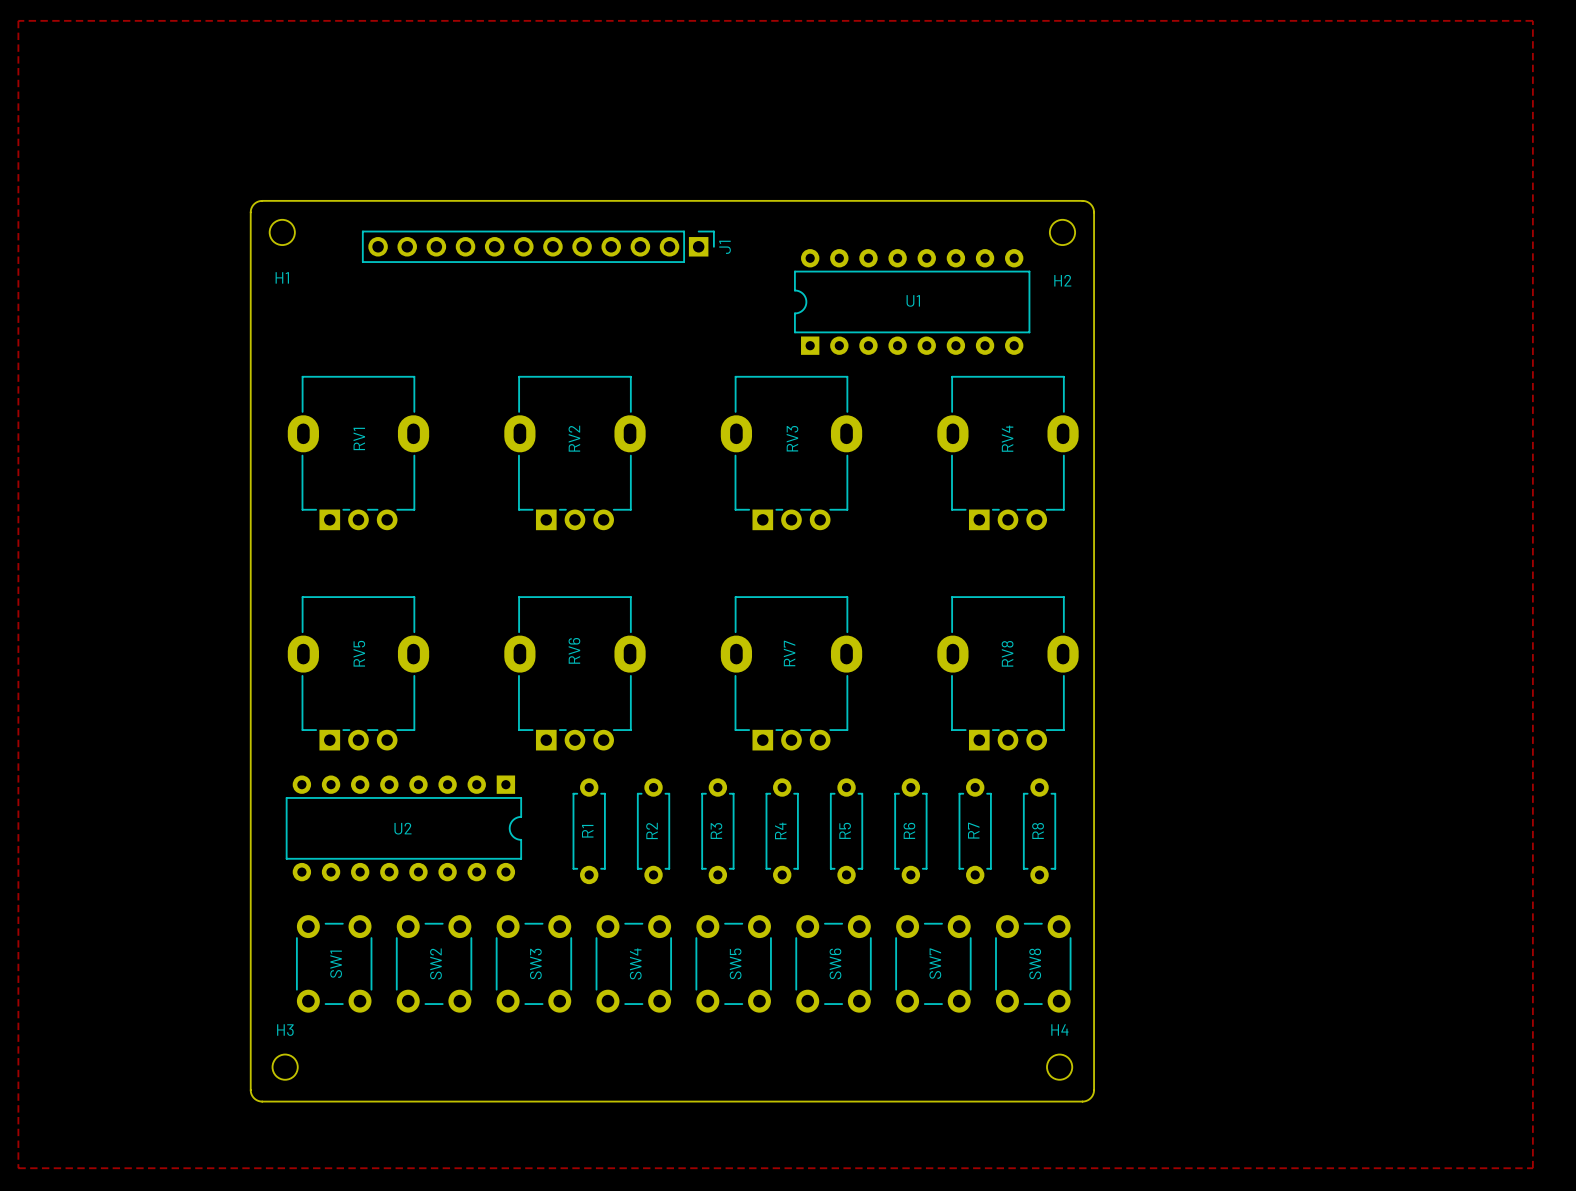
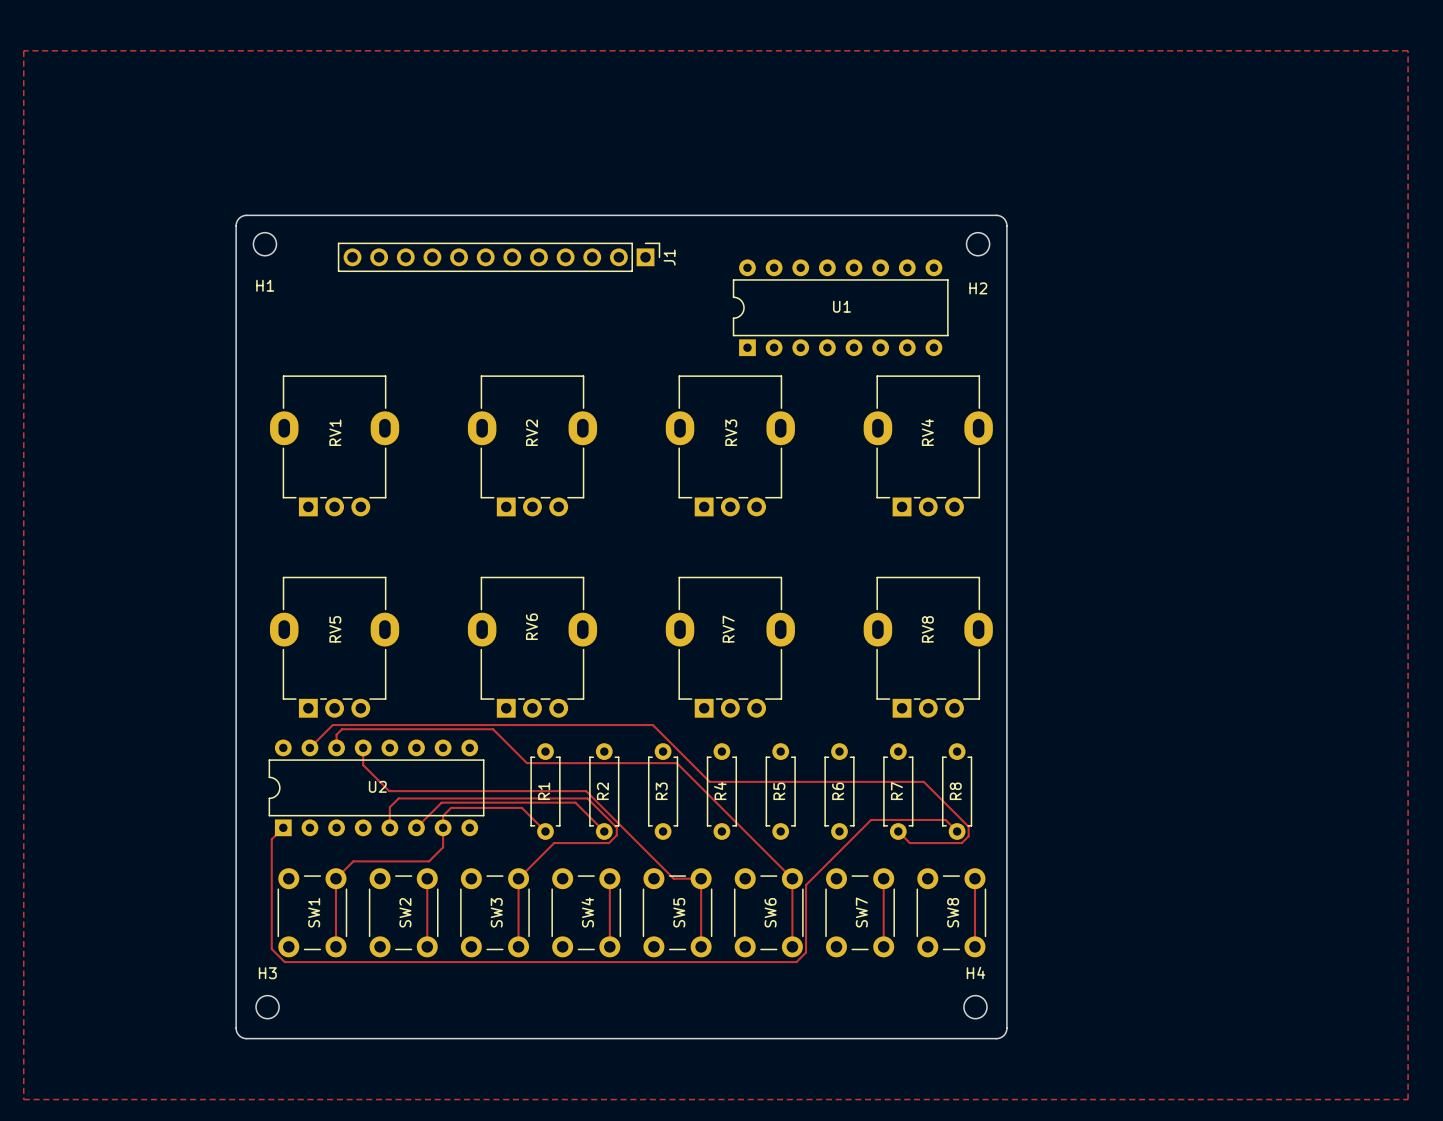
track: none -> (309, 747) (332, 725) (652, 725) (709, 781) (923, 781) (968, 826) (968, 836) (961, 843) (909, 843) (898, 831)
track: none -> (336, 747) (336, 734) (342, 729) (493, 729) (526, 763) (676, 763) (792, 878) (792, 946)
track: none -> (363, 747) (363, 765) (389, 791) (586, 791) (673, 878) (701, 878) (701, 946)
U2 rotation: 0° (403, 828) -> 180° (376, 787)
track: none -> (283, 827) (271, 839) (271, 949) (284, 962) (796, 962) (806, 952) (806, 885) (871, 819) (945, 819) (957, 831)
track: none -> (389, 827) (389, 807) (398, 798) (587, 798) (616, 827) (616, 835) (609, 843) (554, 843) (518, 878) (518, 946)
track: none -> (416, 827) (441, 802) (575, 802) (604, 831)
track: none -> (545, 831) (521, 807) (451, 807) (443, 815) (443, 847) (429, 861) (353, 861) (335, 878) (335, 946)
track: none -> (427, 878) (427, 946)
track: none -> (609, 878) (609, 946)
track: none -> (883, 878) (883, 946)
track: none -> (974, 878) (974, 946)

